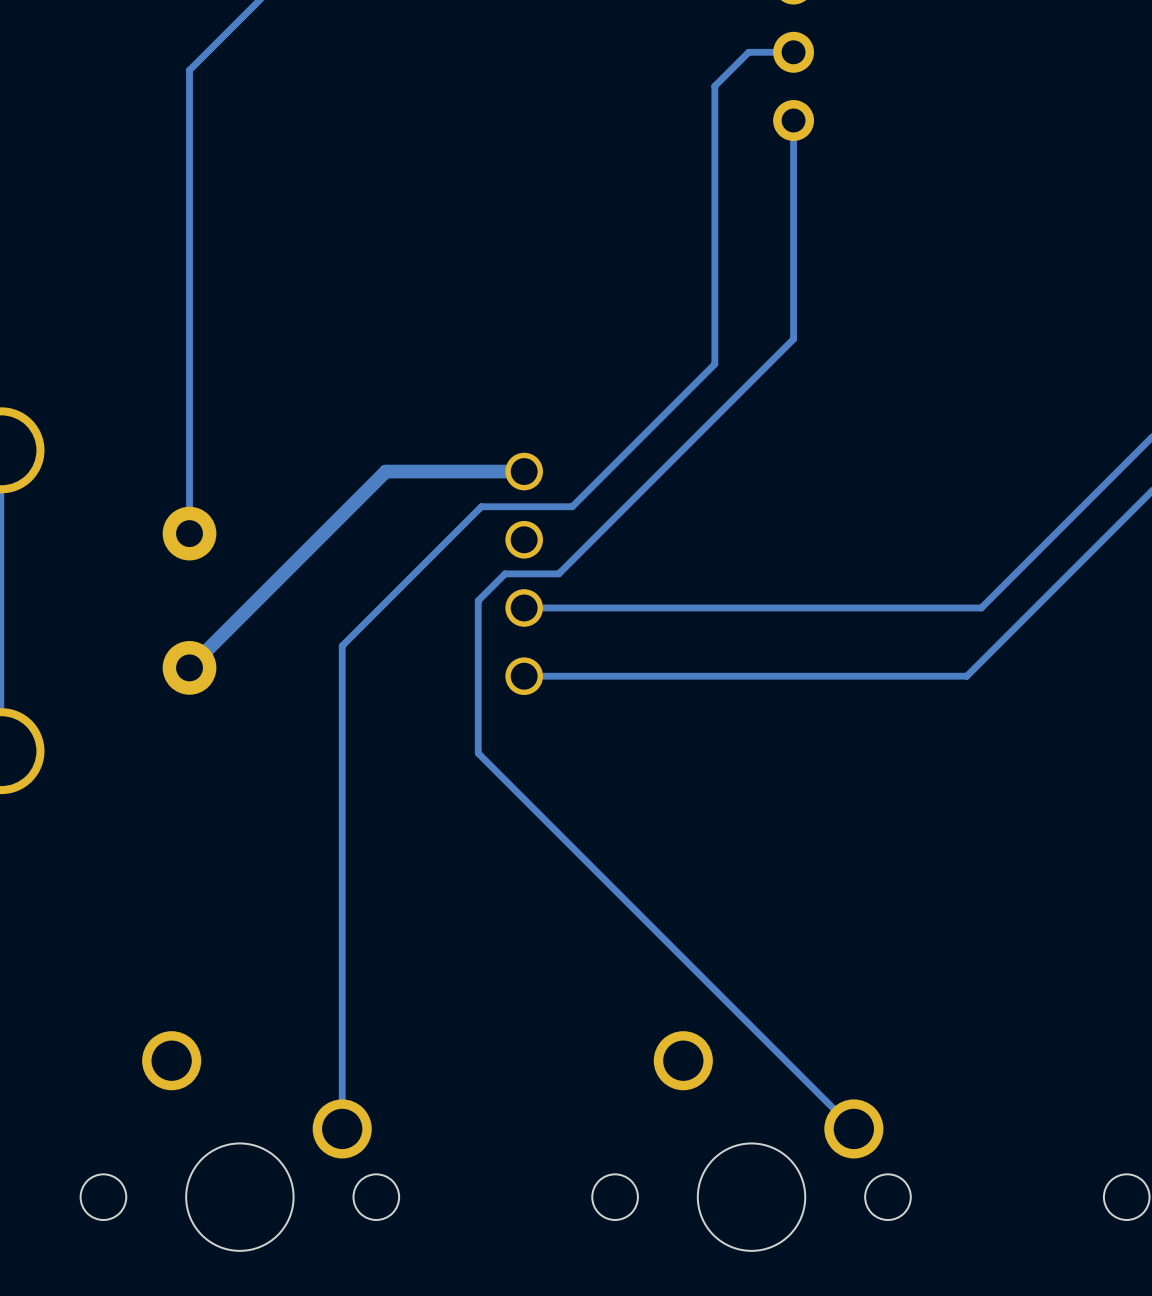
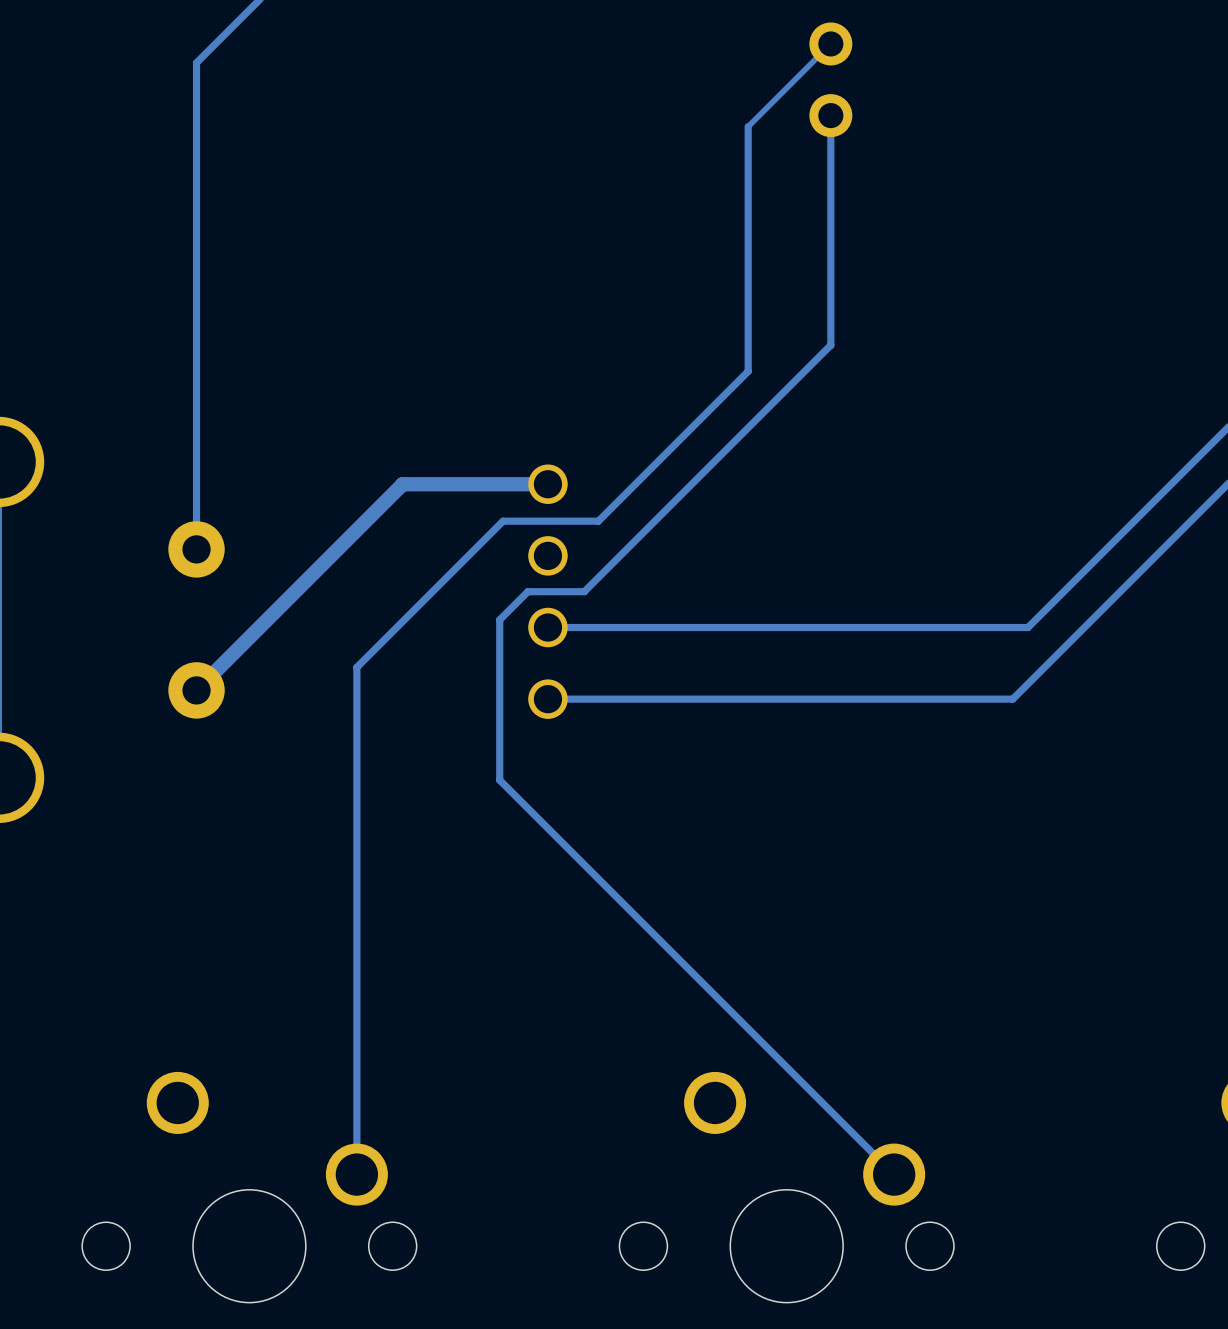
track: (793, 52) (748, 52) (714, 86) (714, 131) -> (830, 43) (748, 126)

